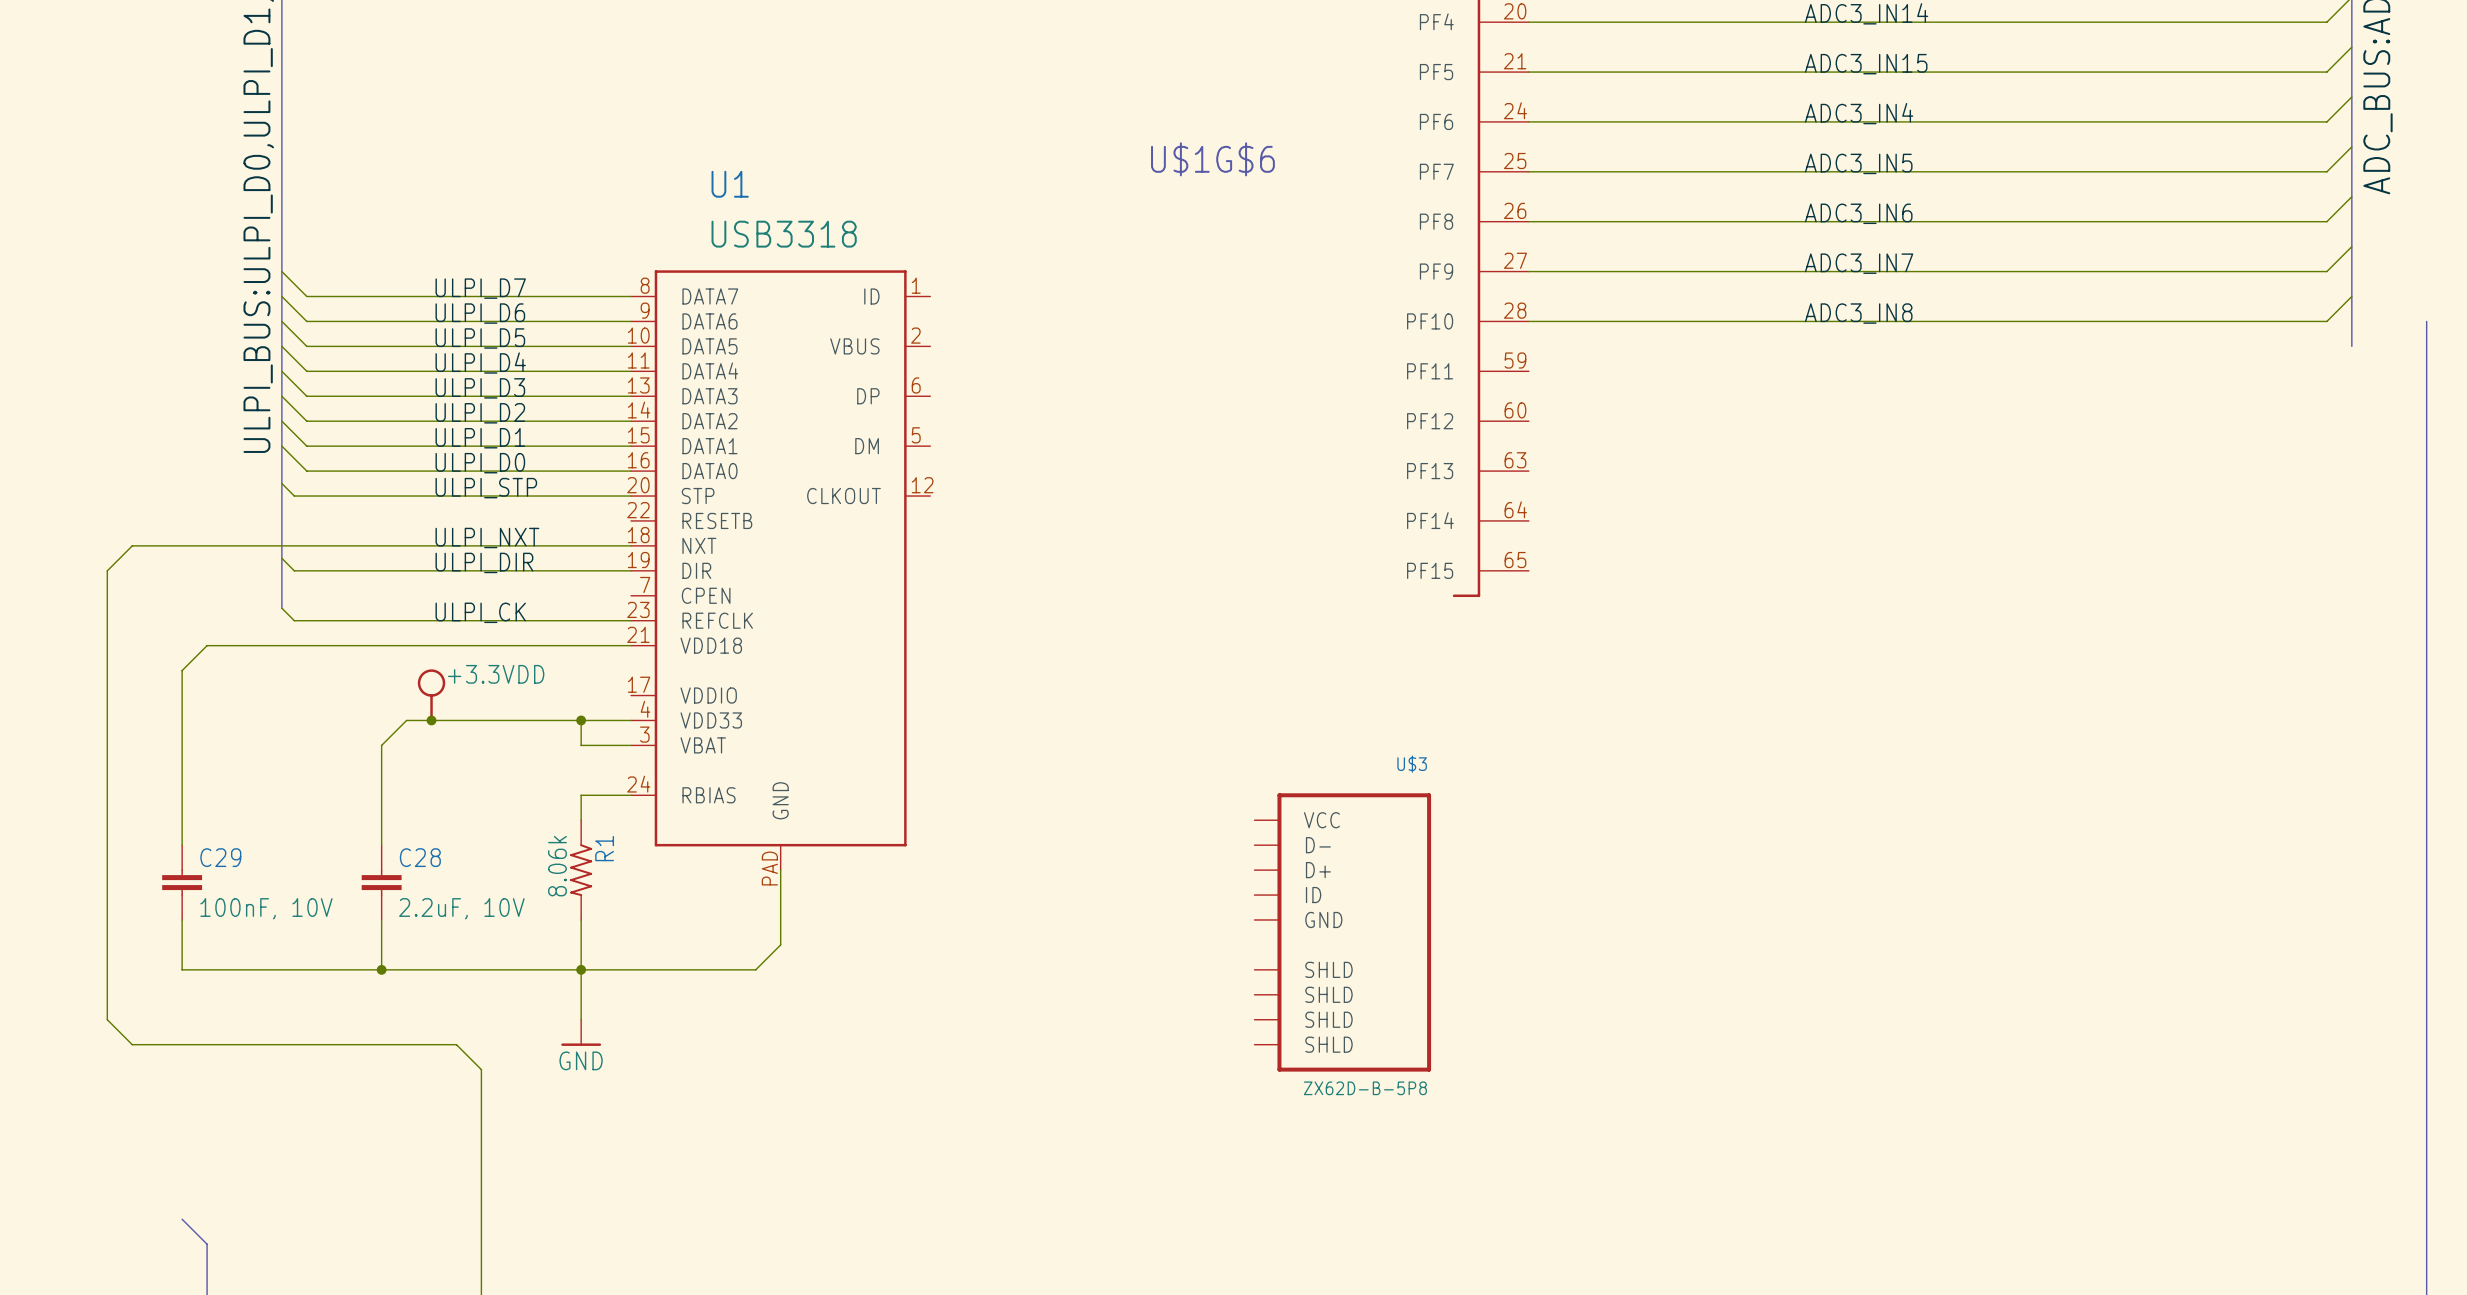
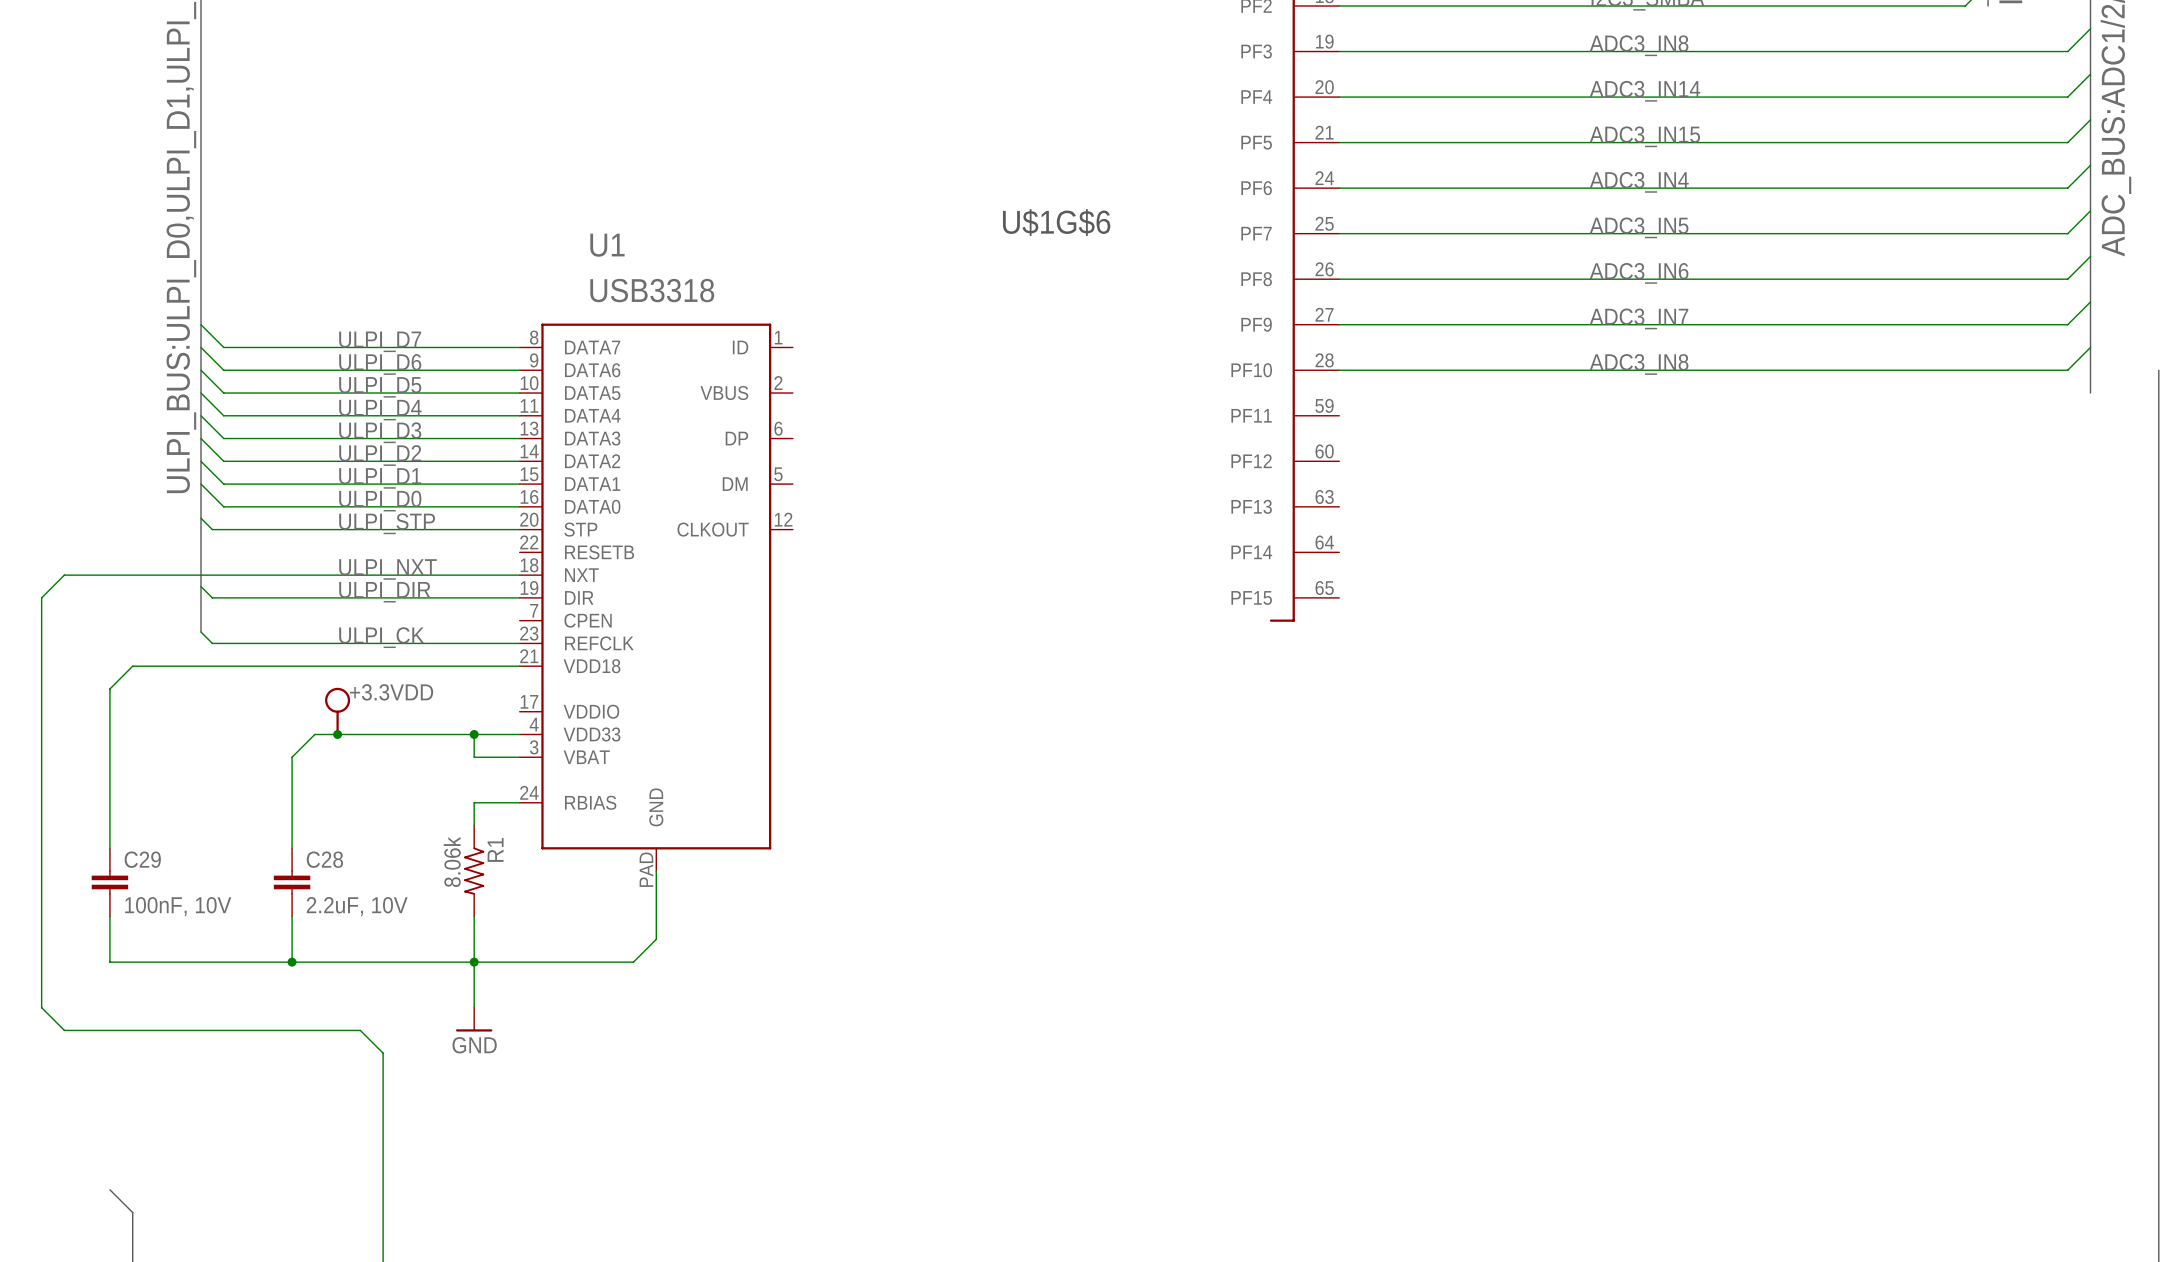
U$3: ZX62D-B-5P8 (1342, 932) -> none

